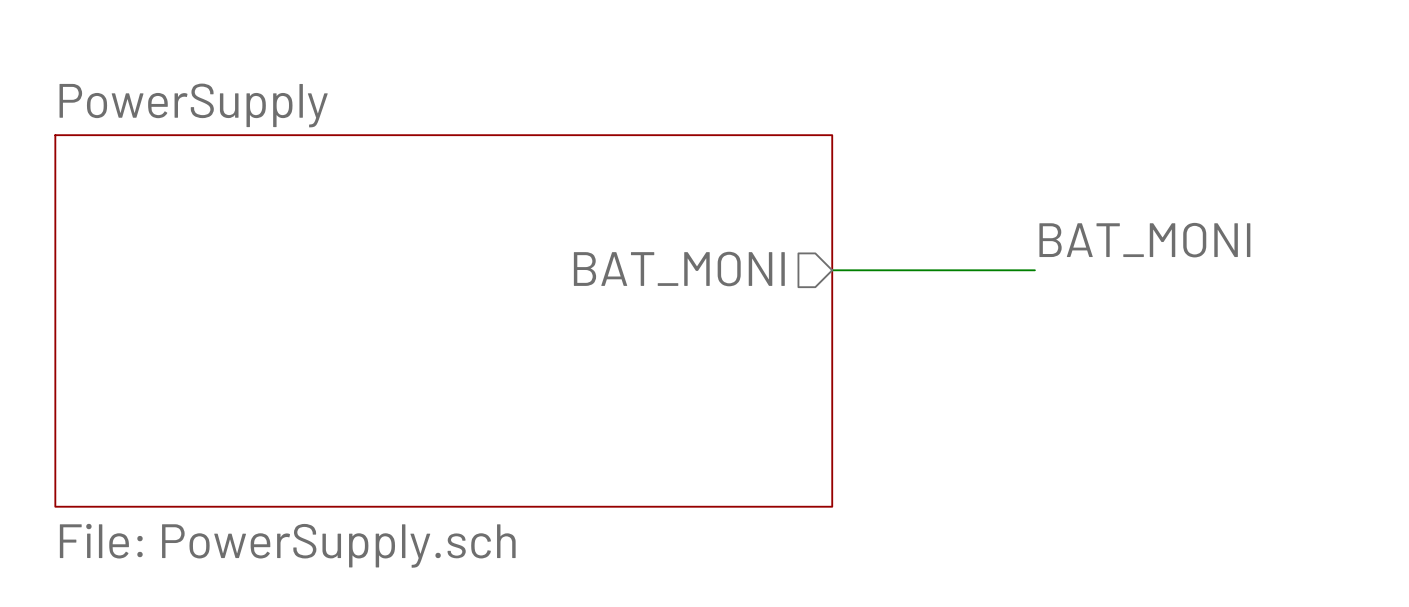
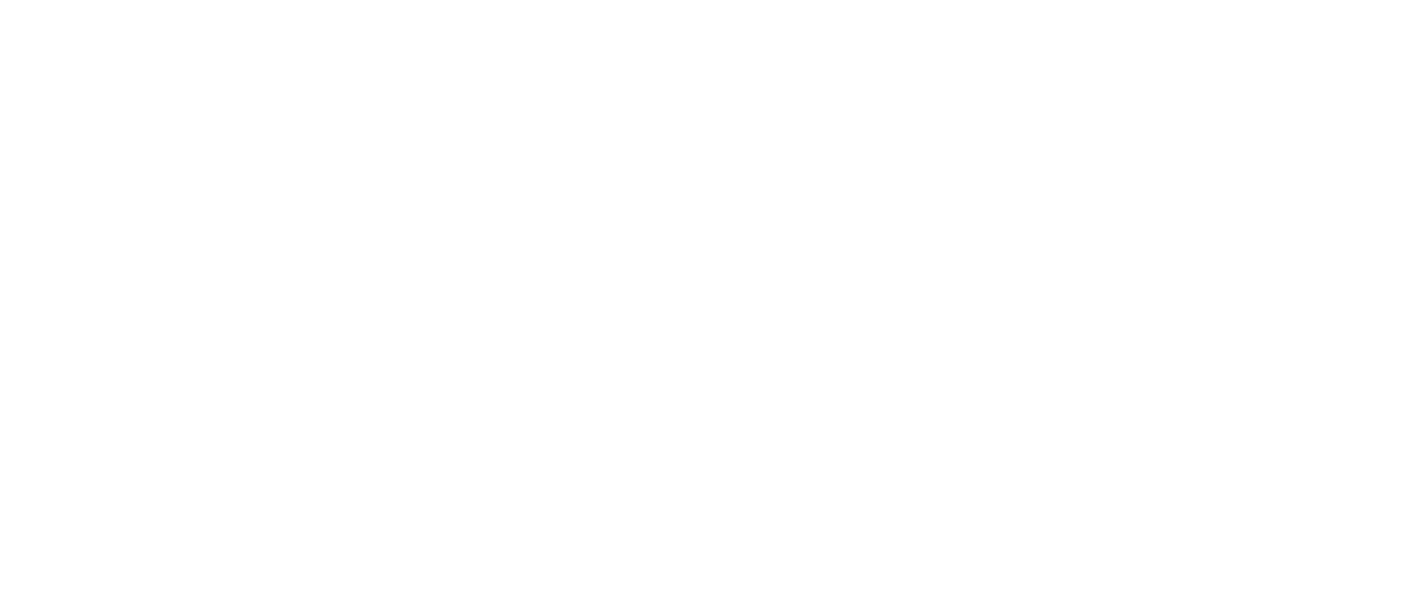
label: BAT_MONI (1144, 240) -> none
sheet pin: BAT_MONI (679, 269) -> none
wire: (832, 270) (1034, 270) -> none
sheet PowerSupply: File: PowerSupply.sch (443, 320) -> none

